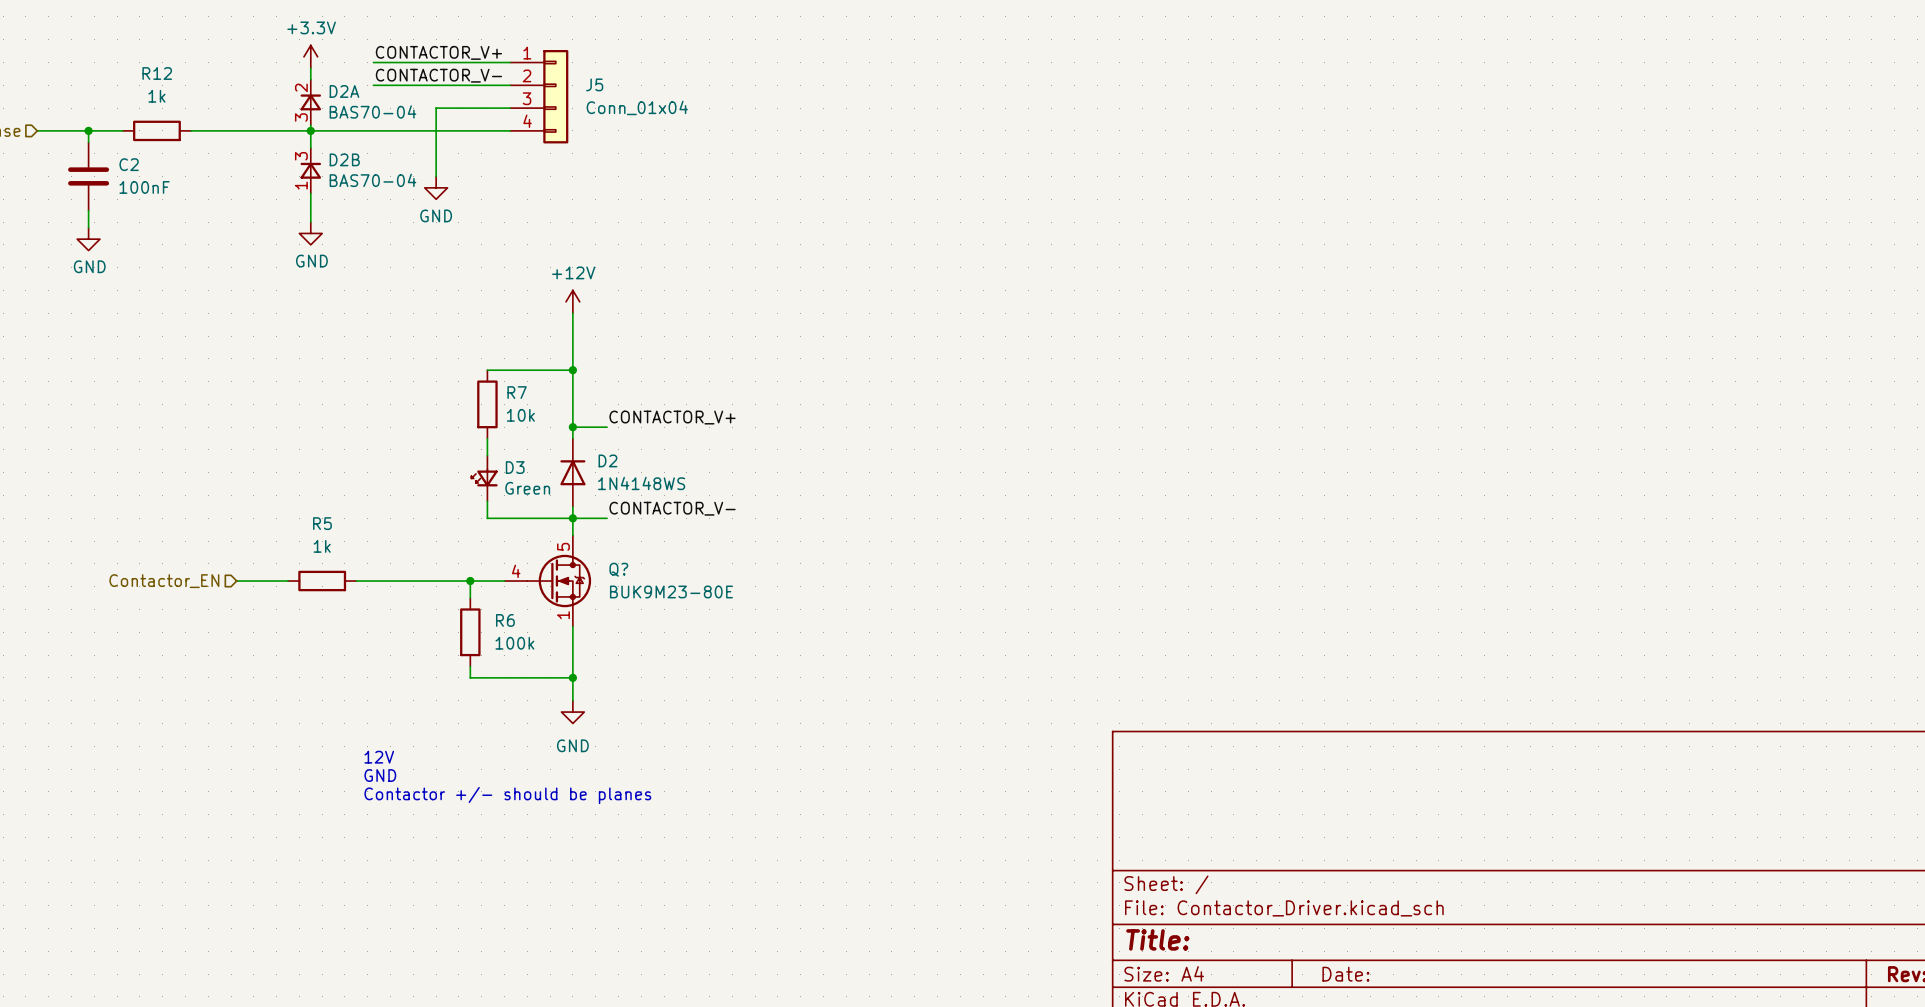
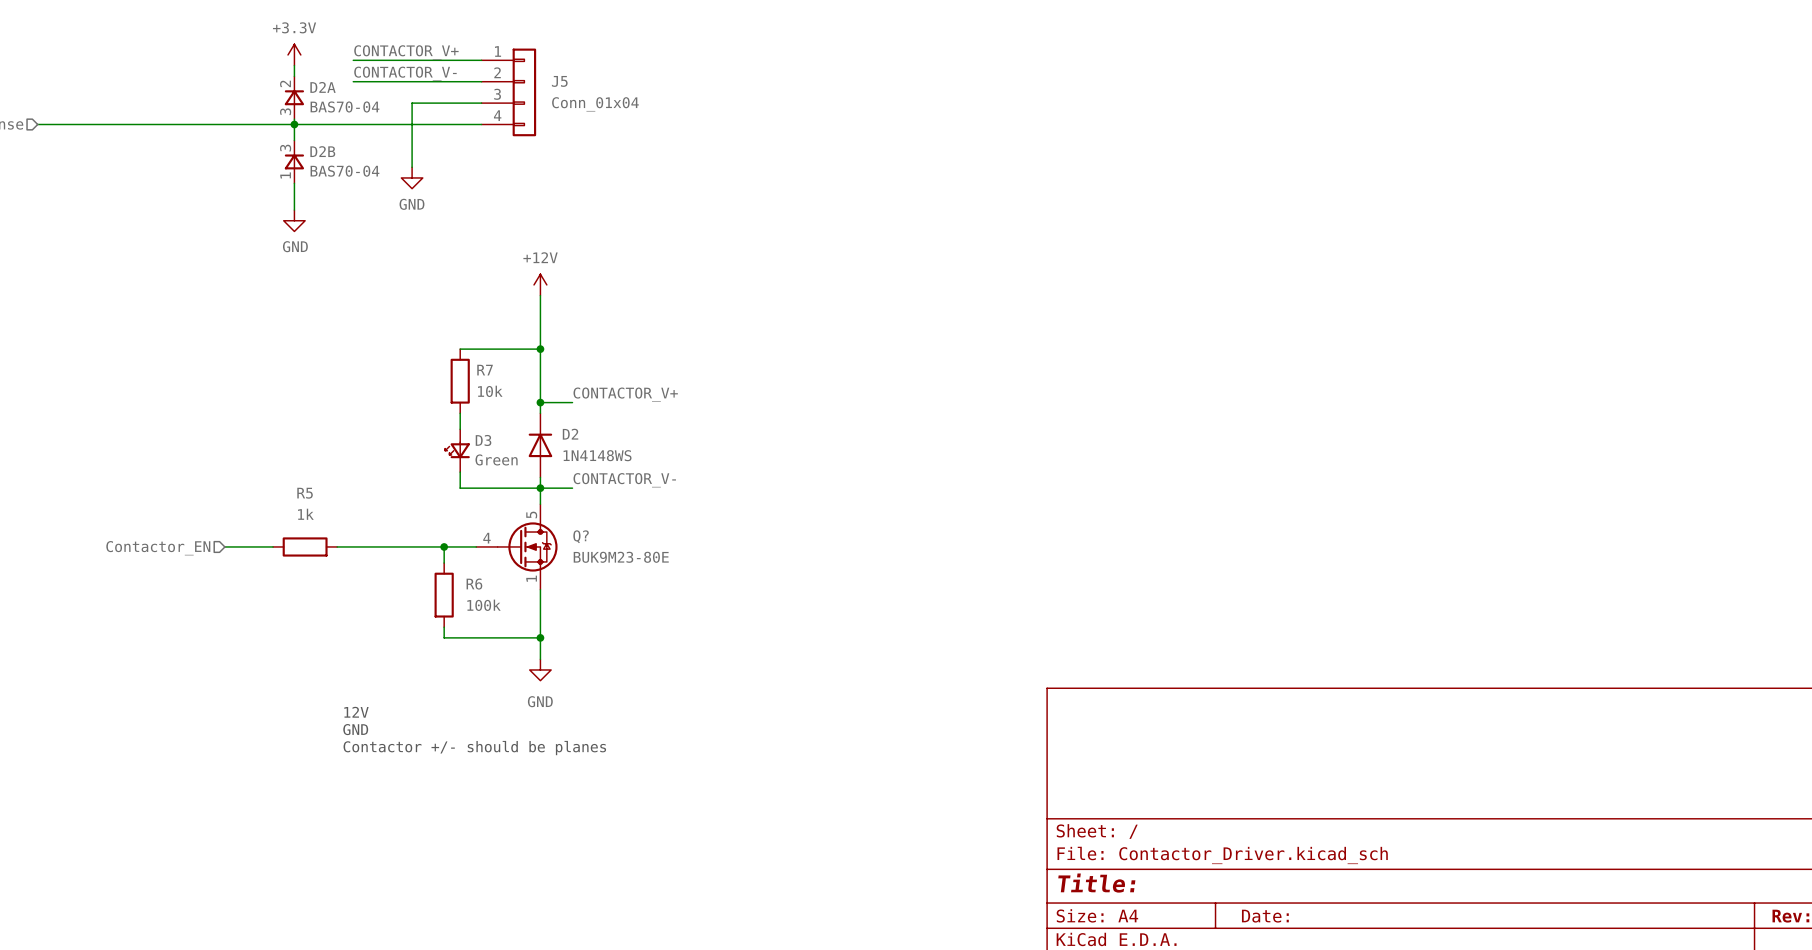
wire: (88, 130) (88, 142) -> none
junction: (88, 130) -> none
wire: none -> (117, 124) (182, 124)
R12: 1k (156, 130) -> none
C2: 100nF (88, 176) -> none
wire: (88, 210) (88, 227) -> none
power symbol: GND (88, 239) -> none

